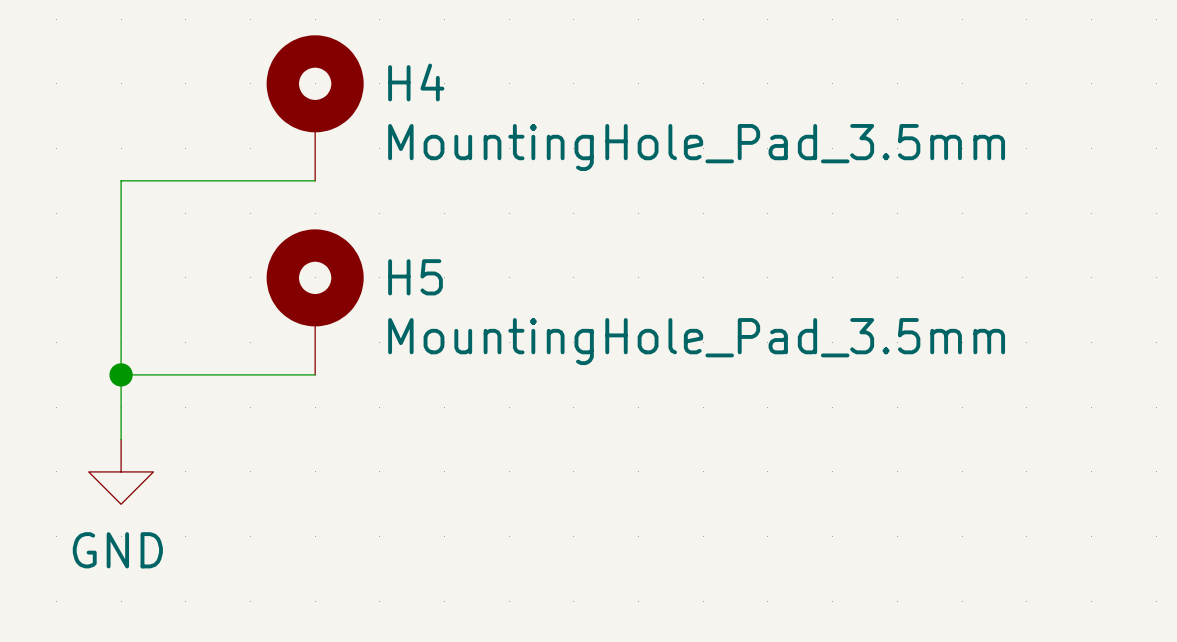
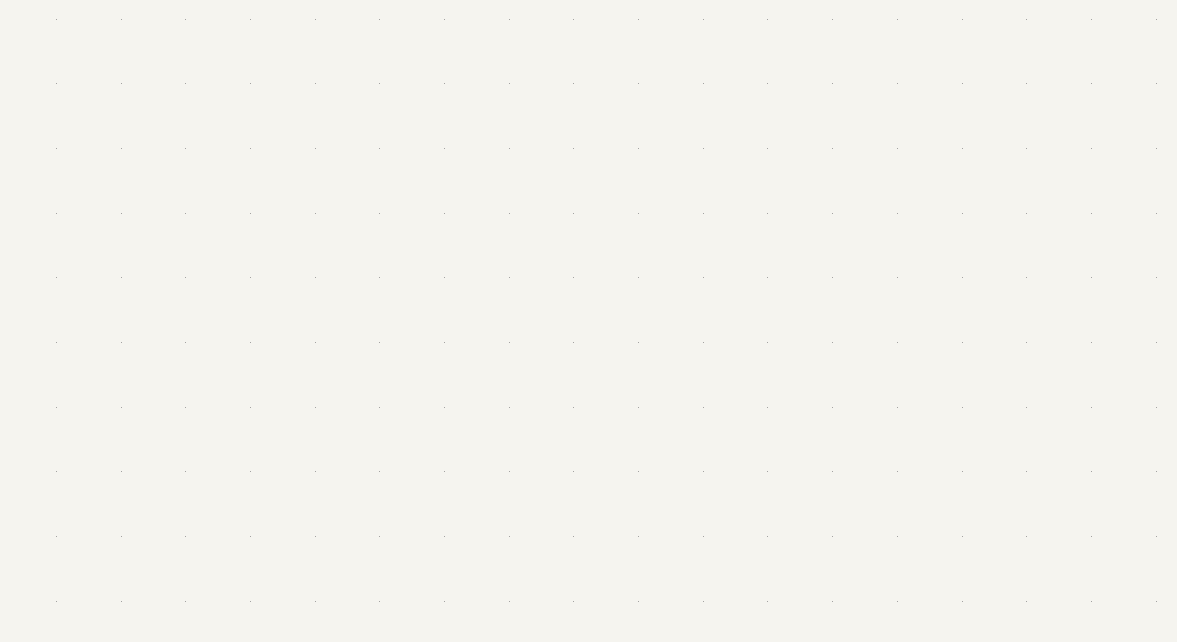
H4: MountingHole_Pad_3.5mm (315, 108) -> none
wire: (315, 180) (121, 180) (121, 439) -> none
H5: MountingHole_Pad_3.5mm (315, 302) -> none
wire: (121, 374) (315, 374) -> none
junction: (121, 374) -> none
power symbol: GND (121, 471) -> none

